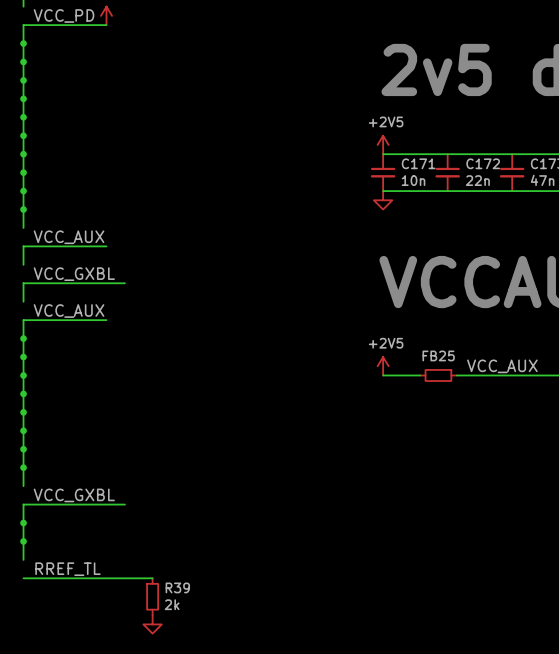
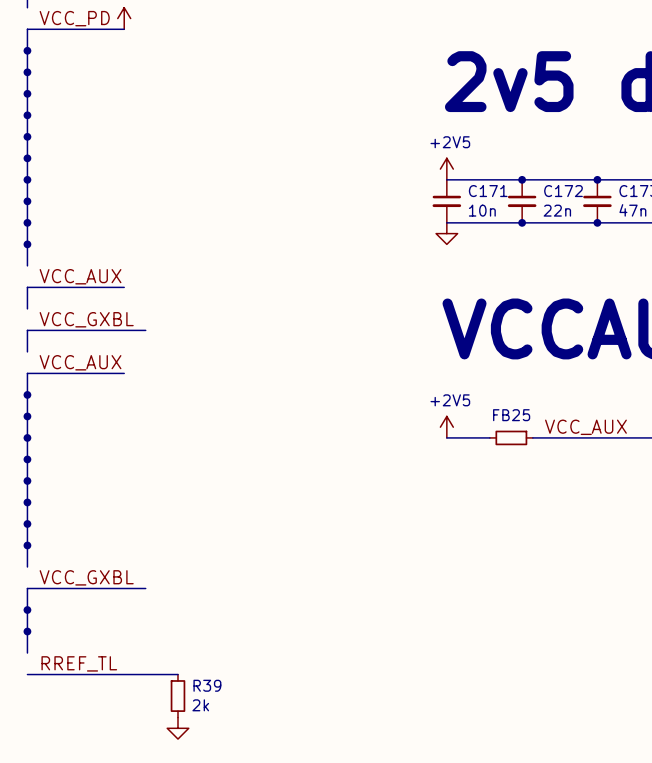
junction: none -> (522, 179)
junction: none -> (597, 179)
junction: none -> (522, 222)
junction: none -> (597, 222)

